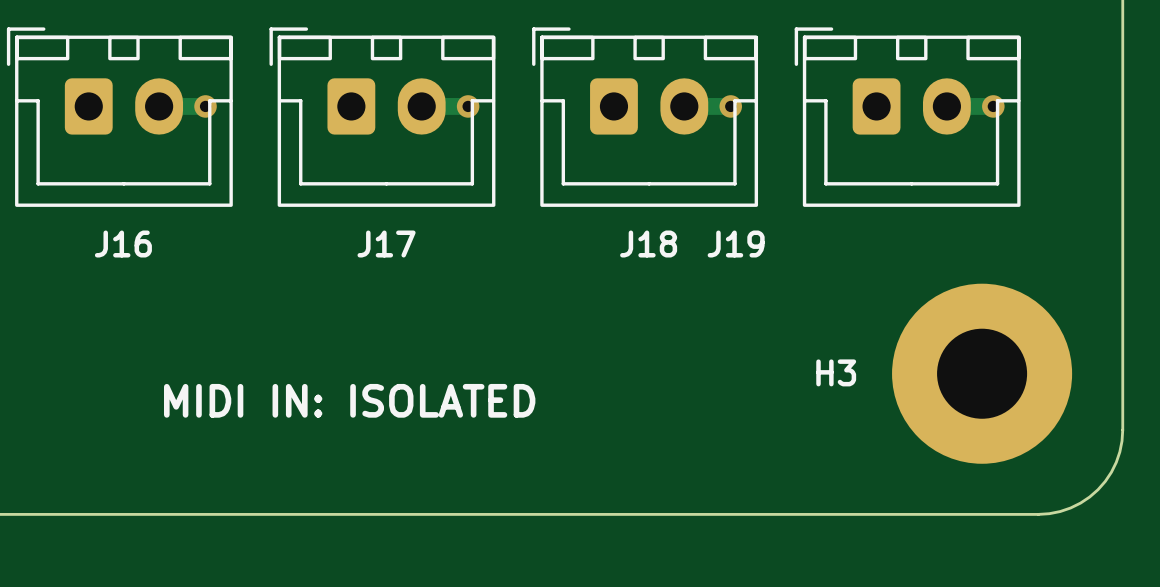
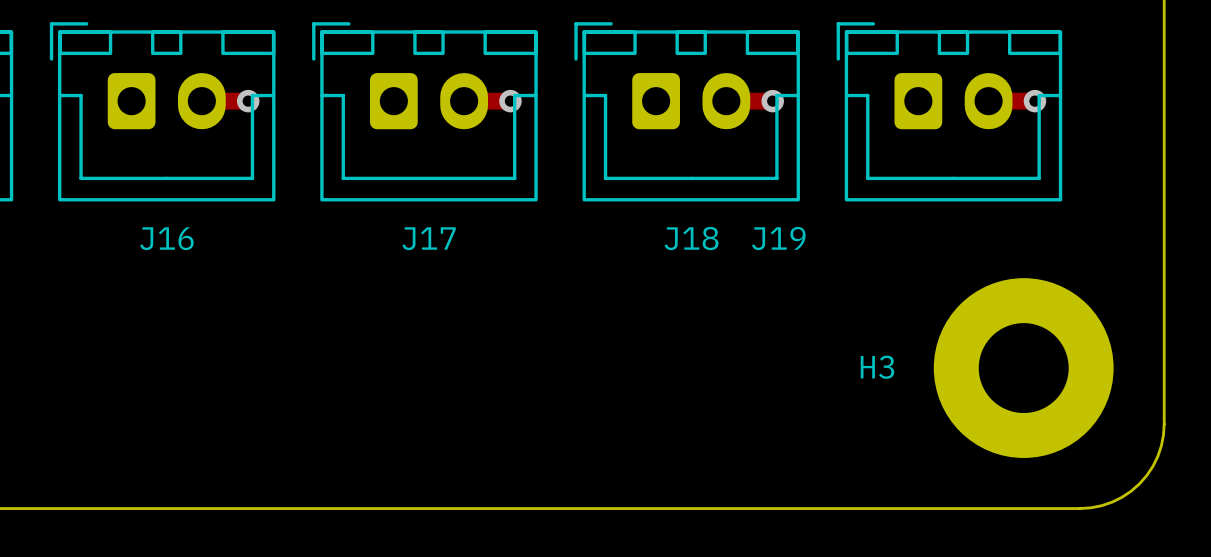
text: MIDI IN: ISOLATED (349, 400) -> none

